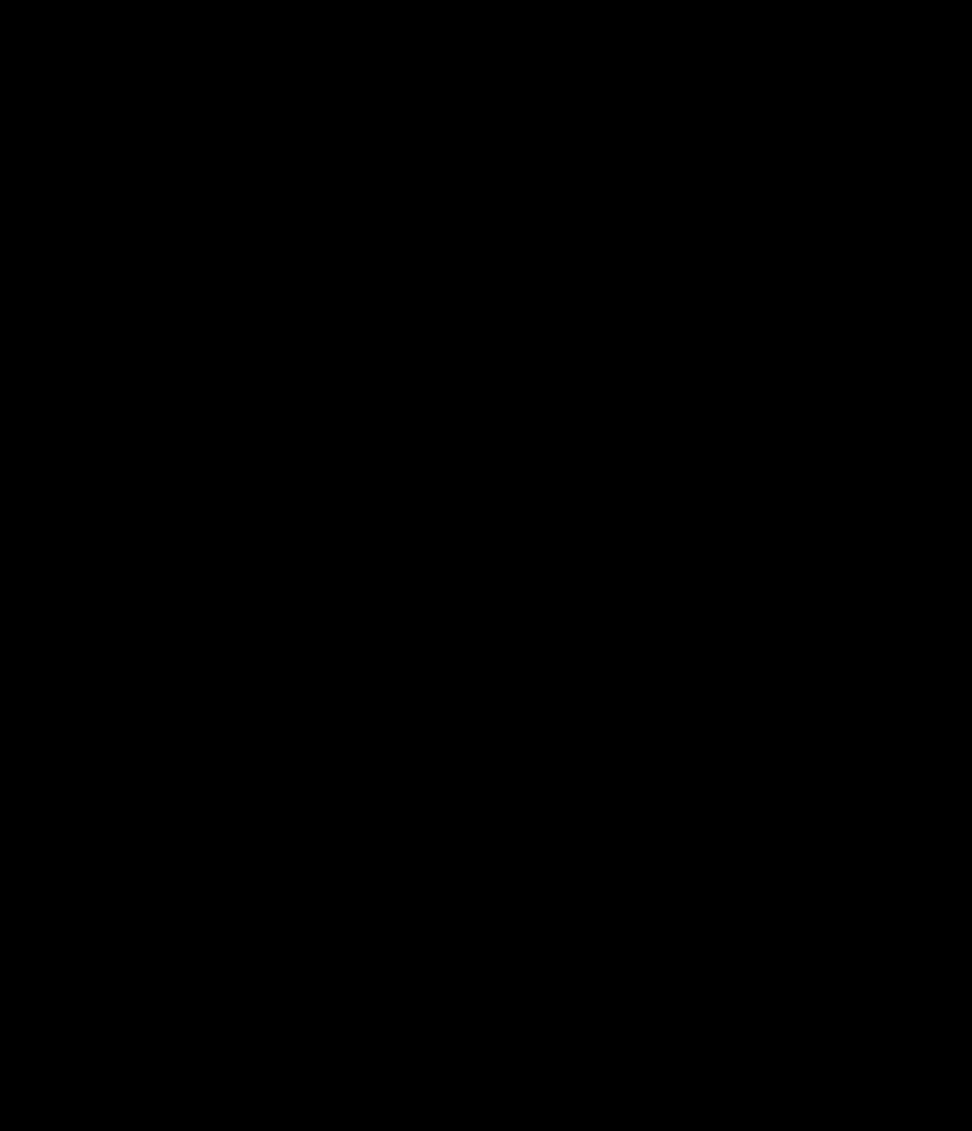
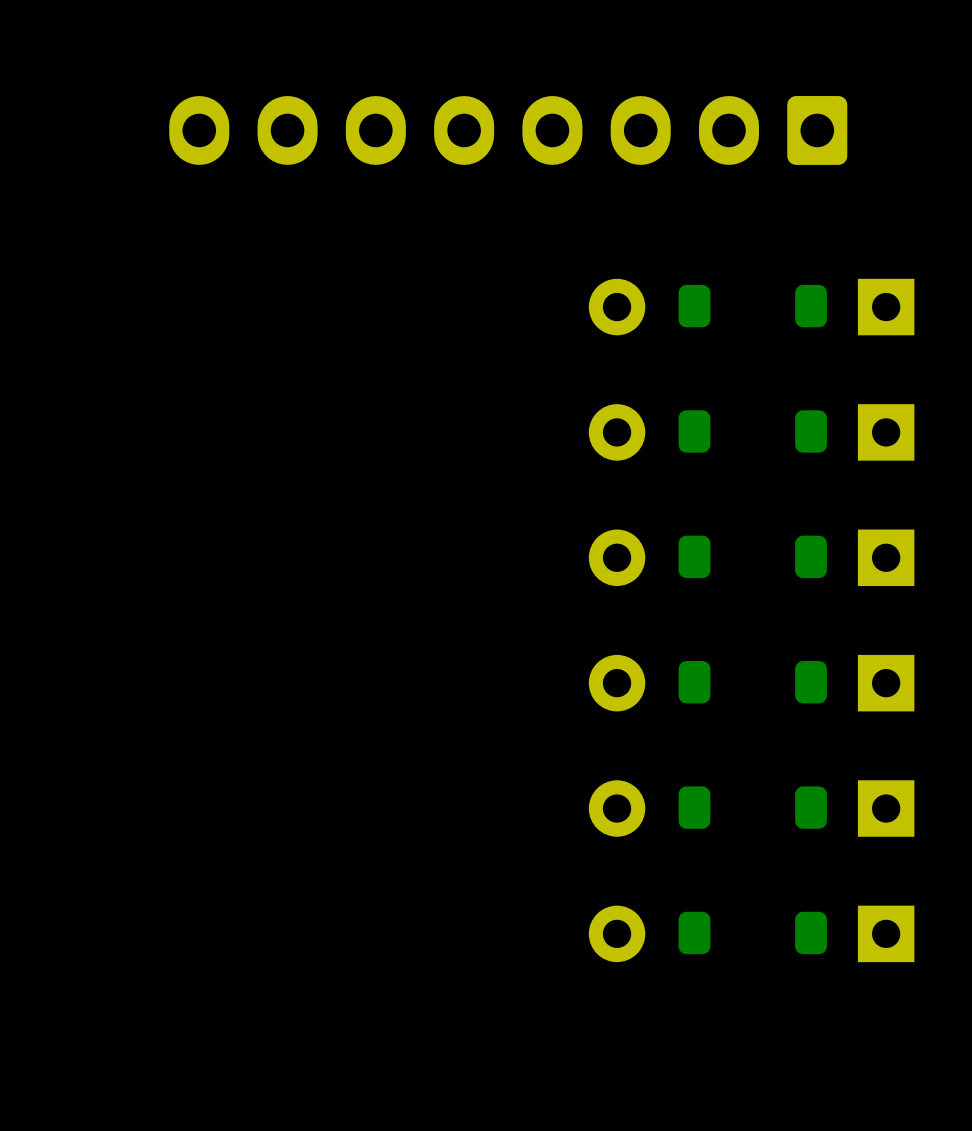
part: none -> (508, 130)
part: none -> (751, 307)
part: none -> (751, 432)
part: none -> (751, 557)
part: none -> (751, 683)
part: none -> (751, 808)
part: none -> (751, 933)

